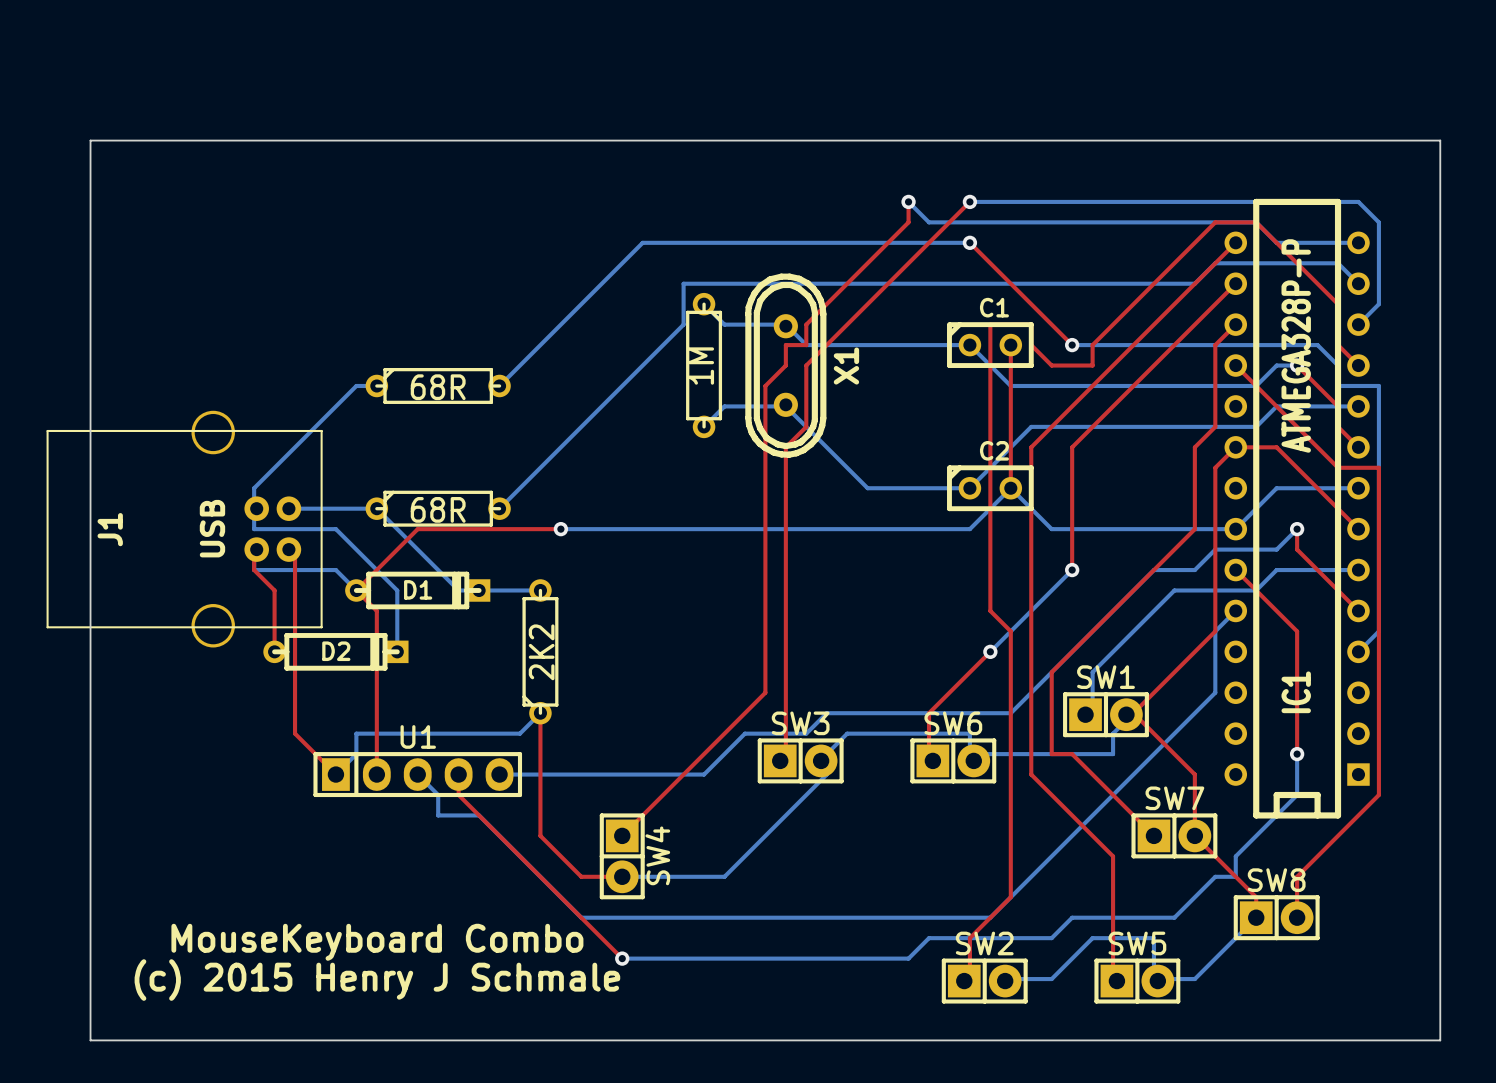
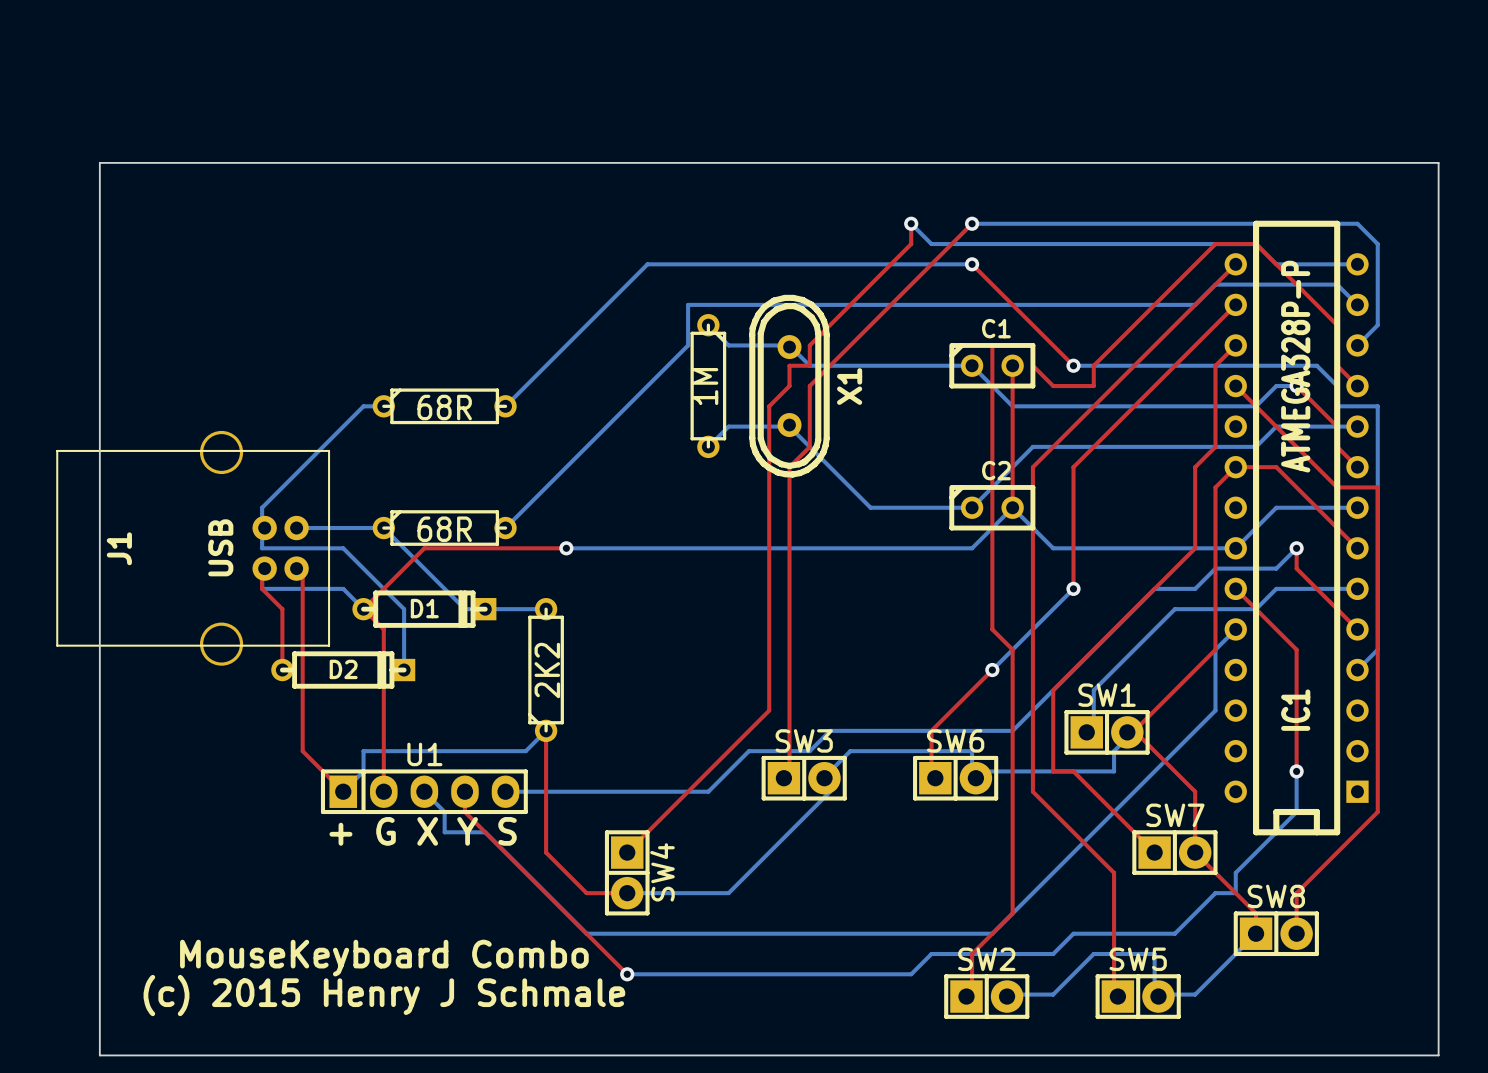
text: none -> + G X Y S (423, 831)

